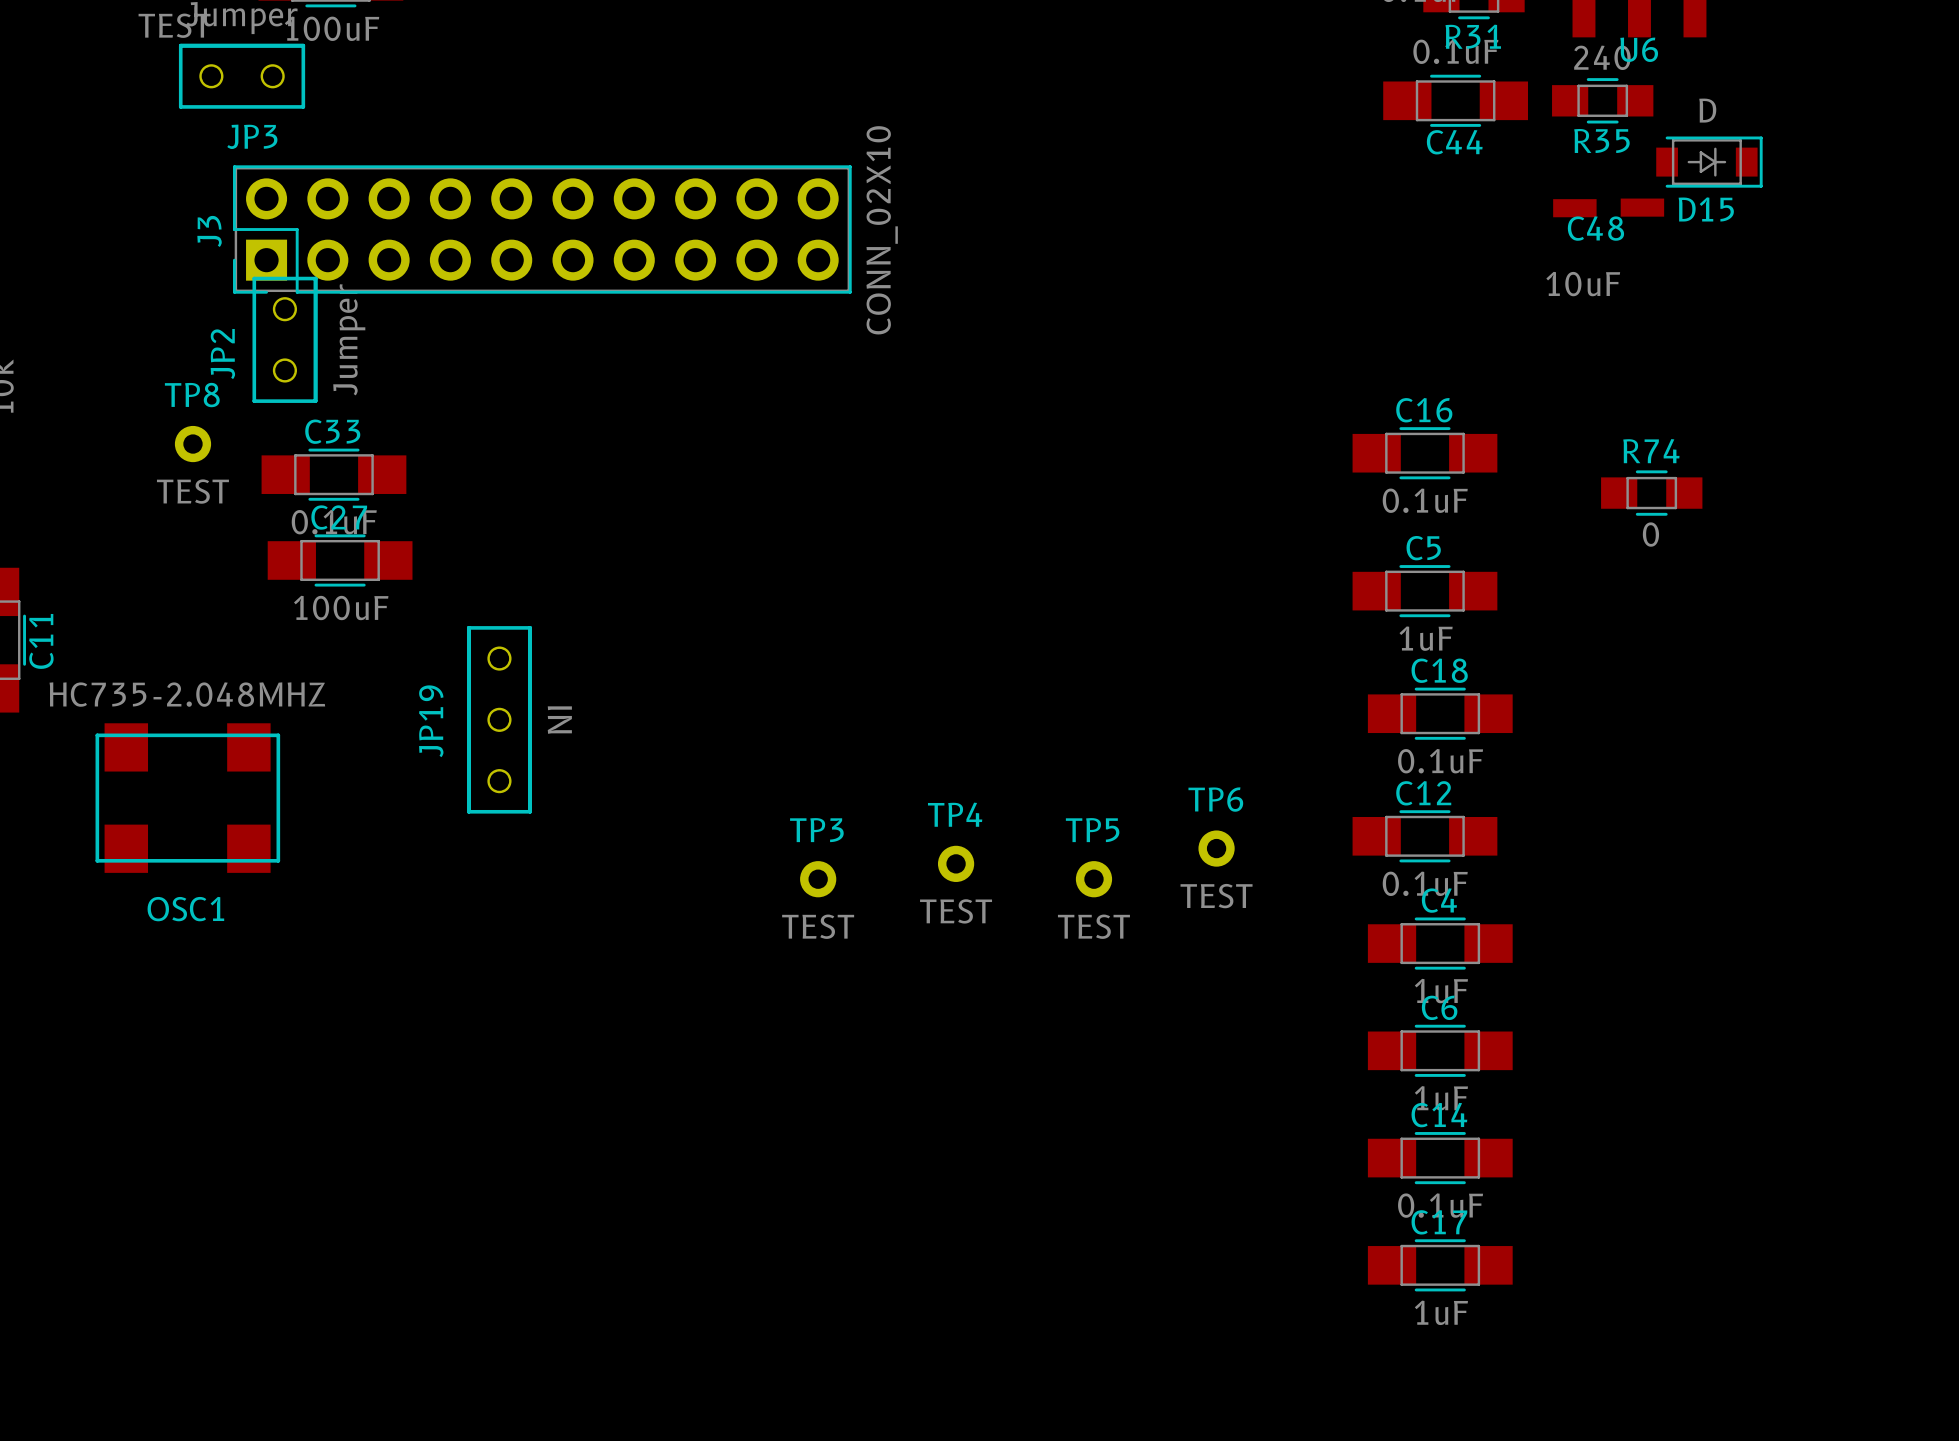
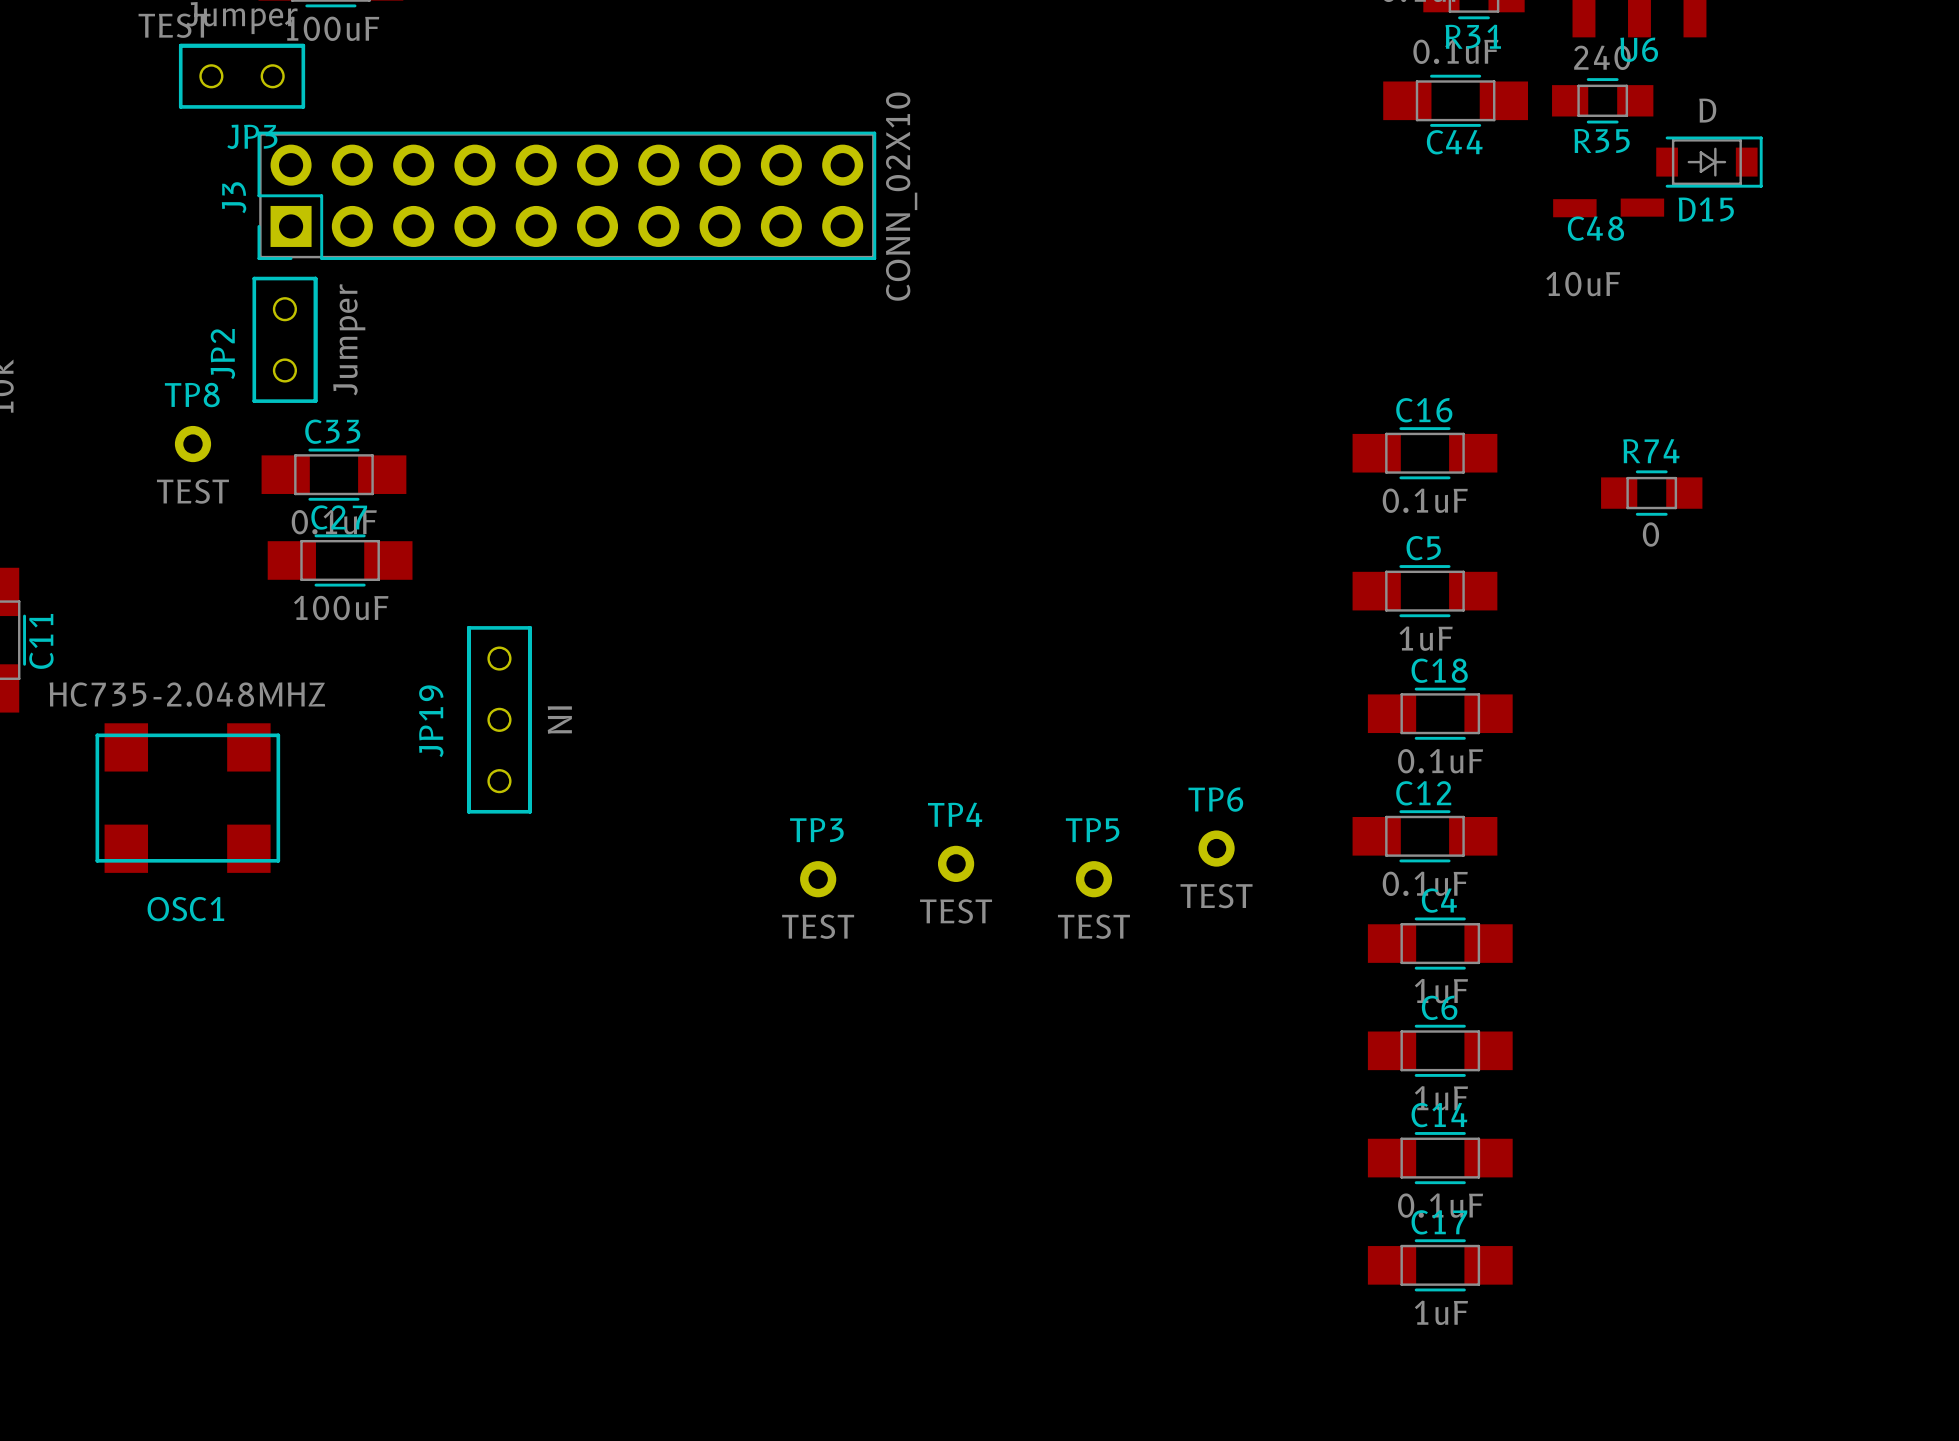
J3 position: (542, 229) -> (566, 195)
J3 value position: CONN_02X10 (882, 230) -> CONN_02X10 (901, 196)

